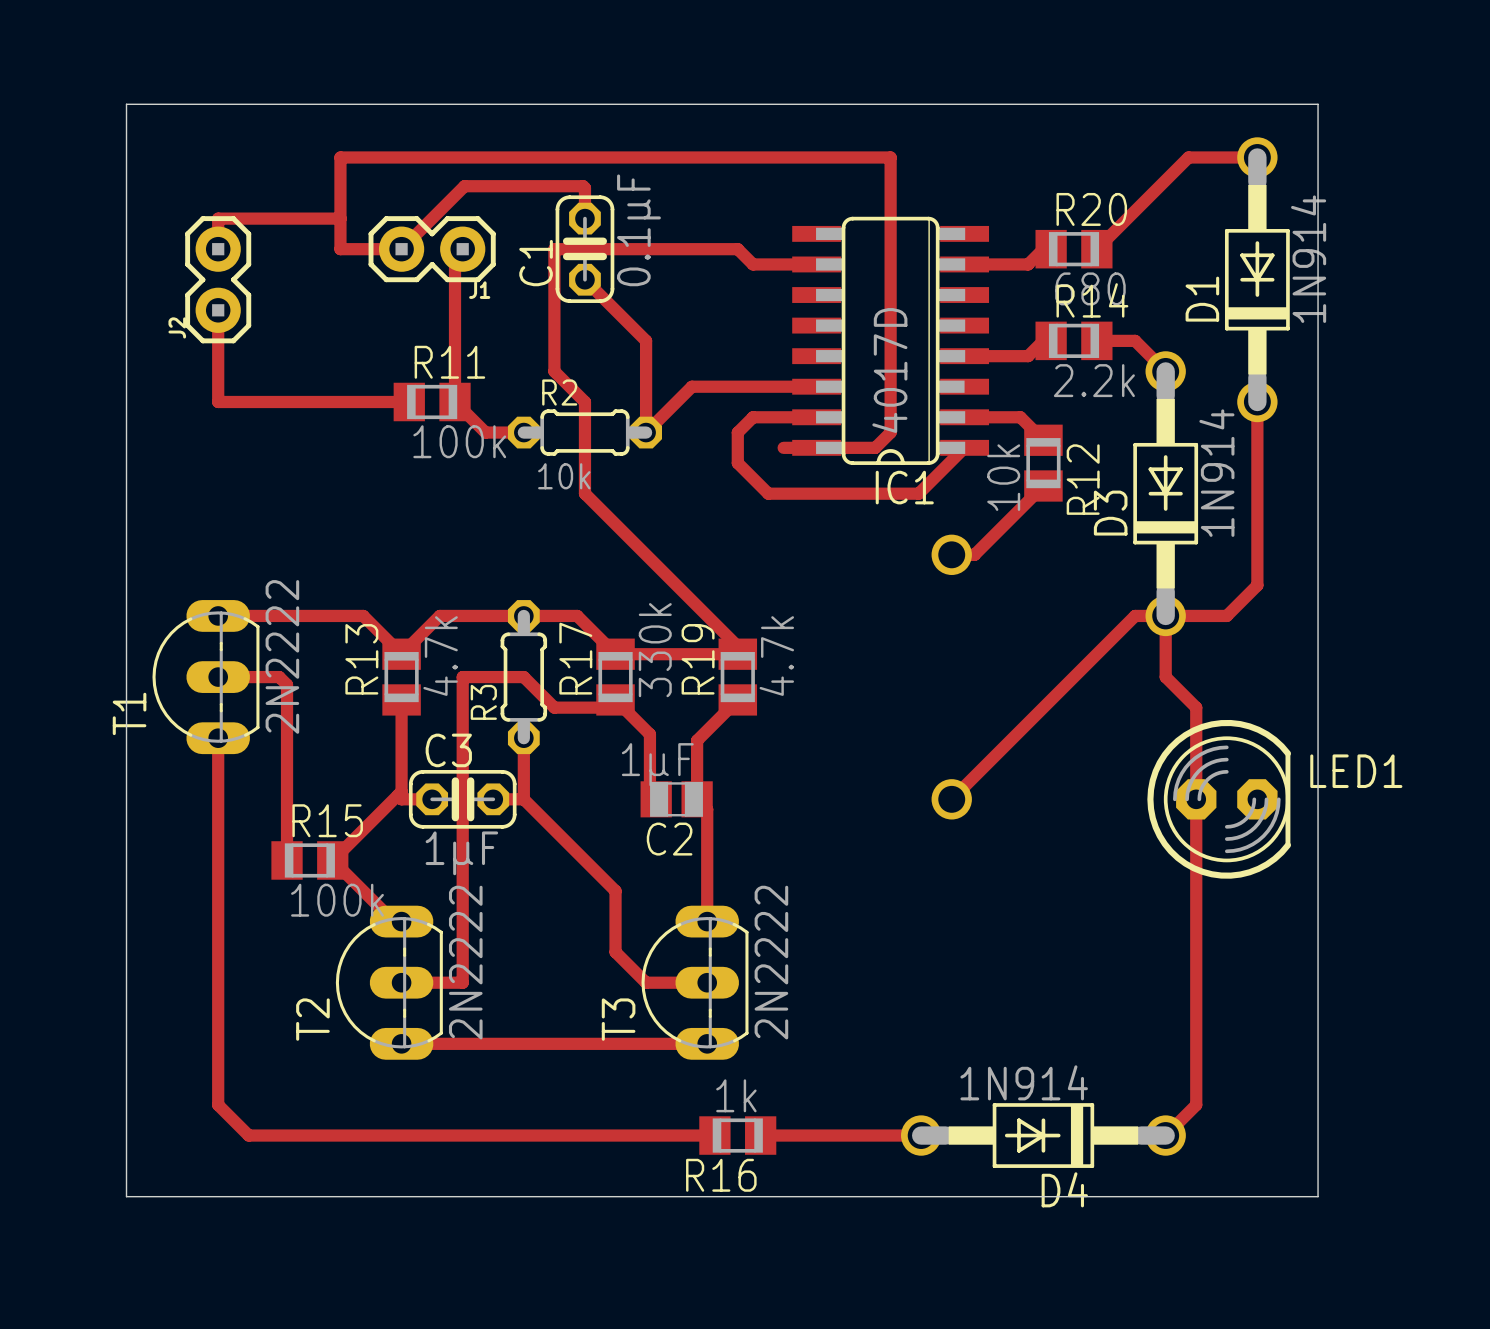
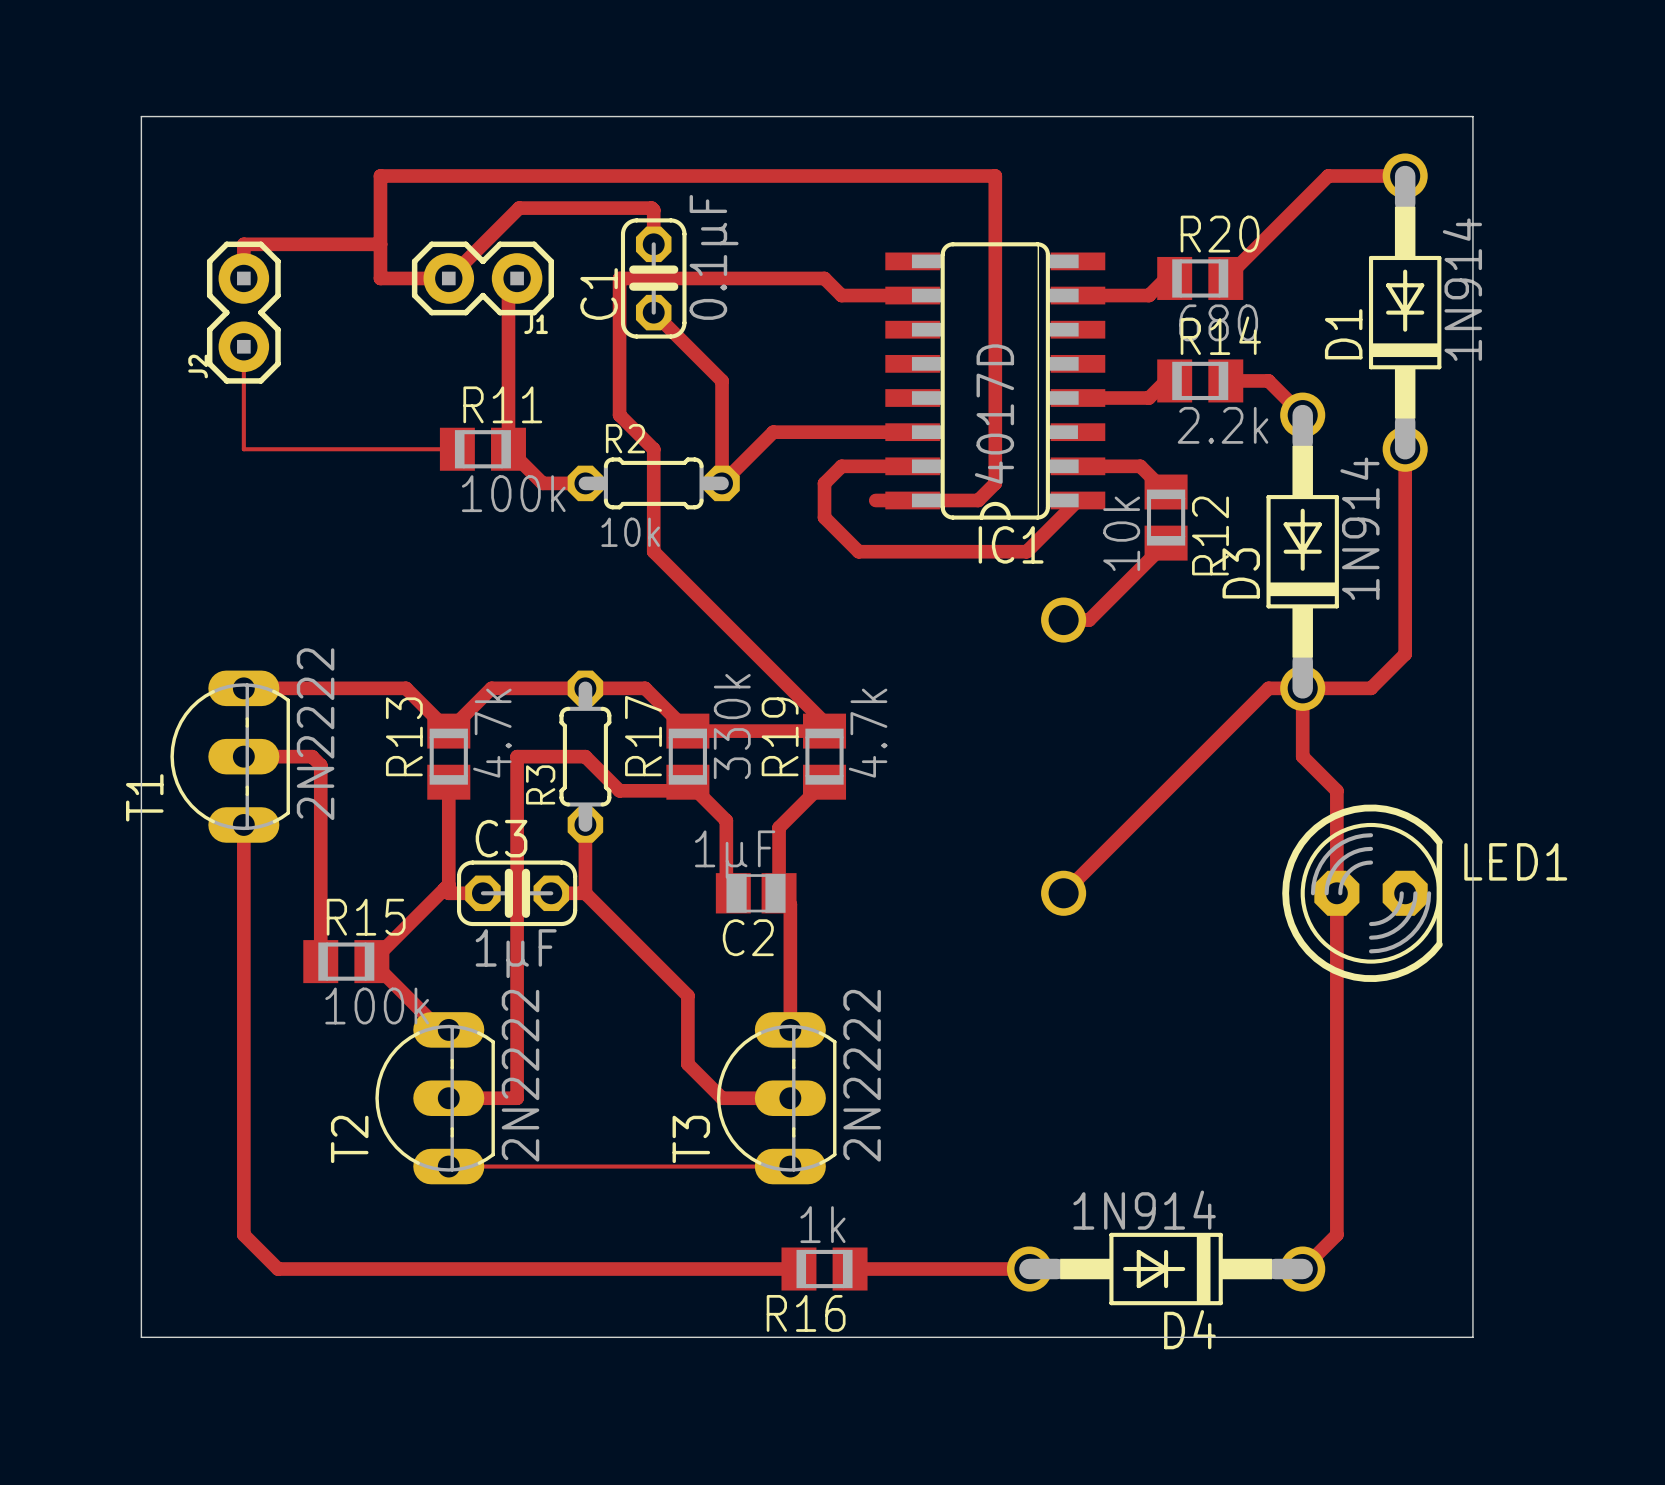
top track width: thick (218, 310) (218, 402) (409, 402) -> thin (243, 346) (243, 449) (457, 449)
top track width: thick (401, 1043) (707, 1043) -> thin (448, 1166) (790, 1166)

